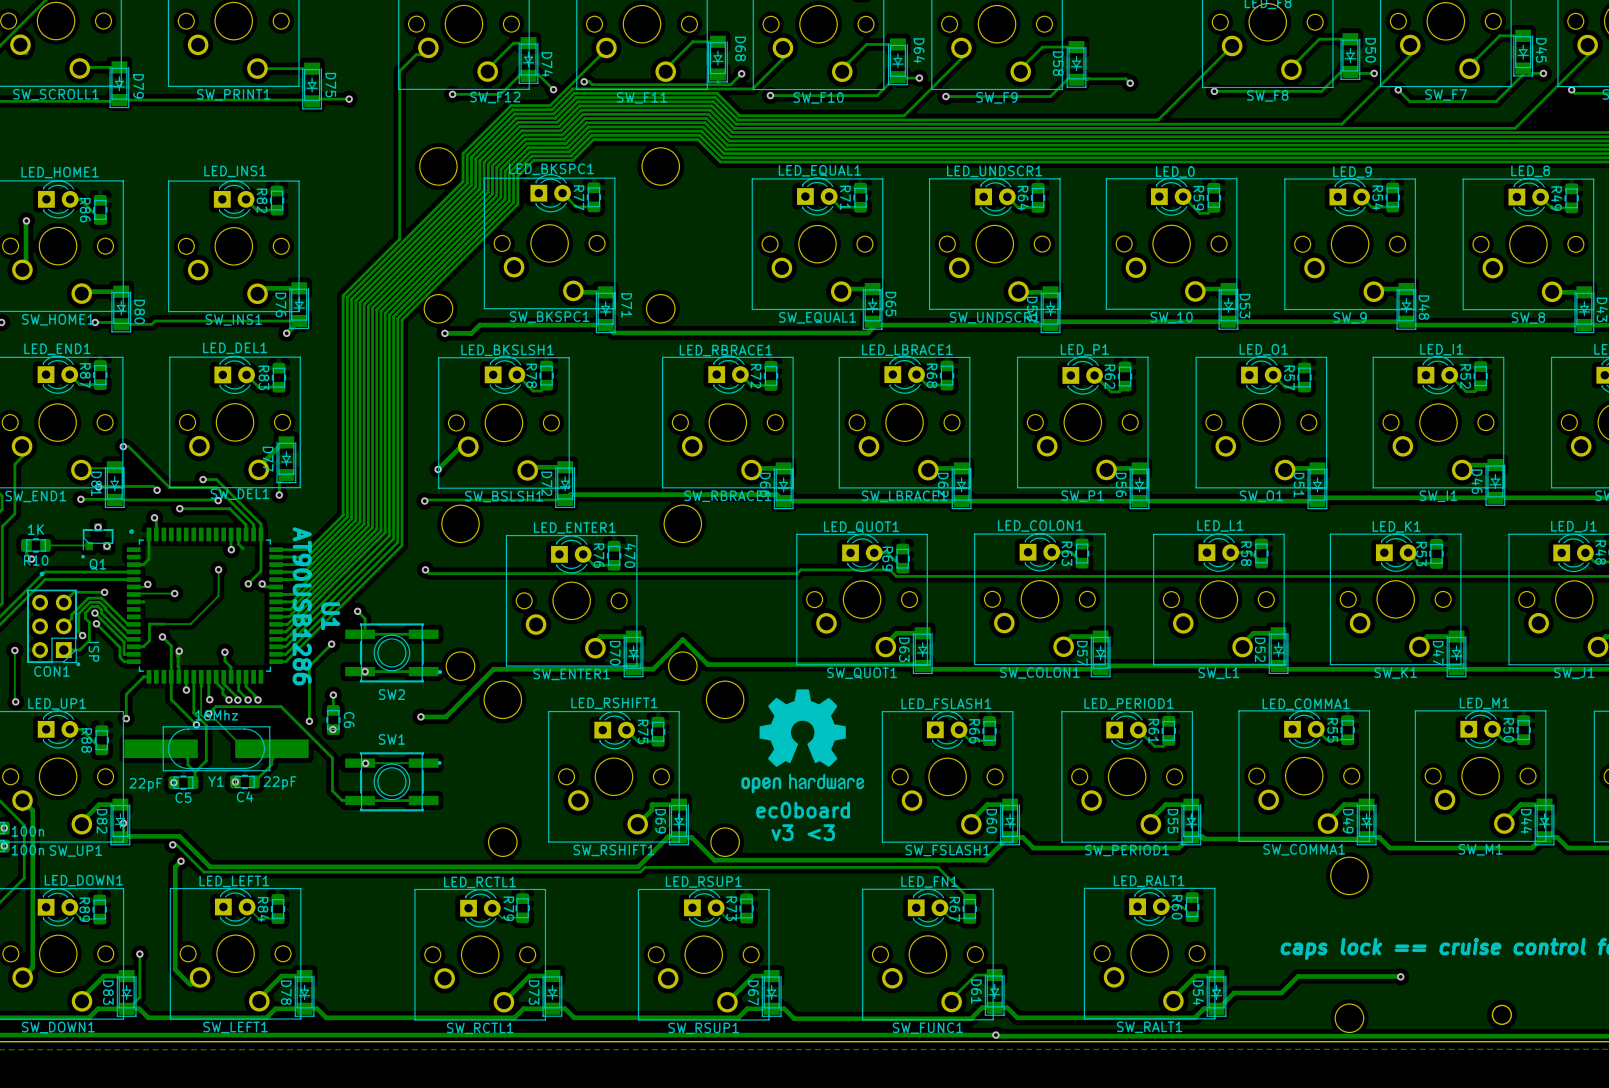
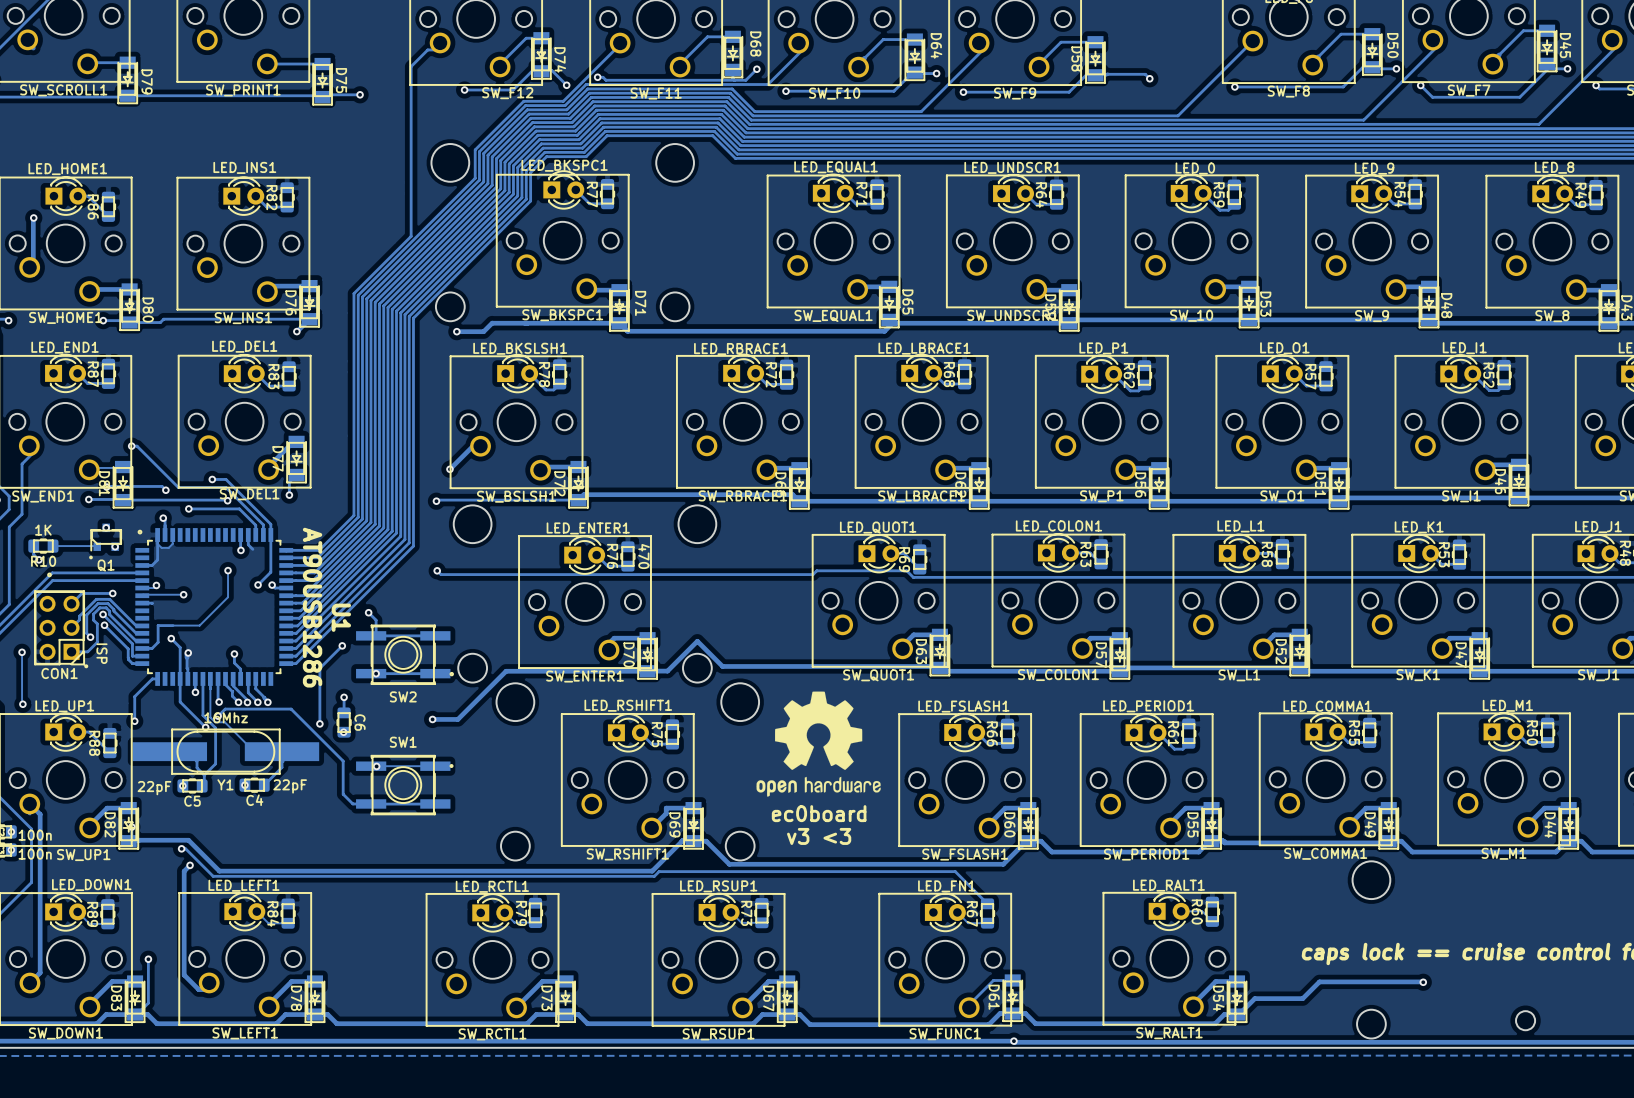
track: none -> (172, 535) (172, 543) (168, 547) (161, 547) (157, 543) (157, 535)

